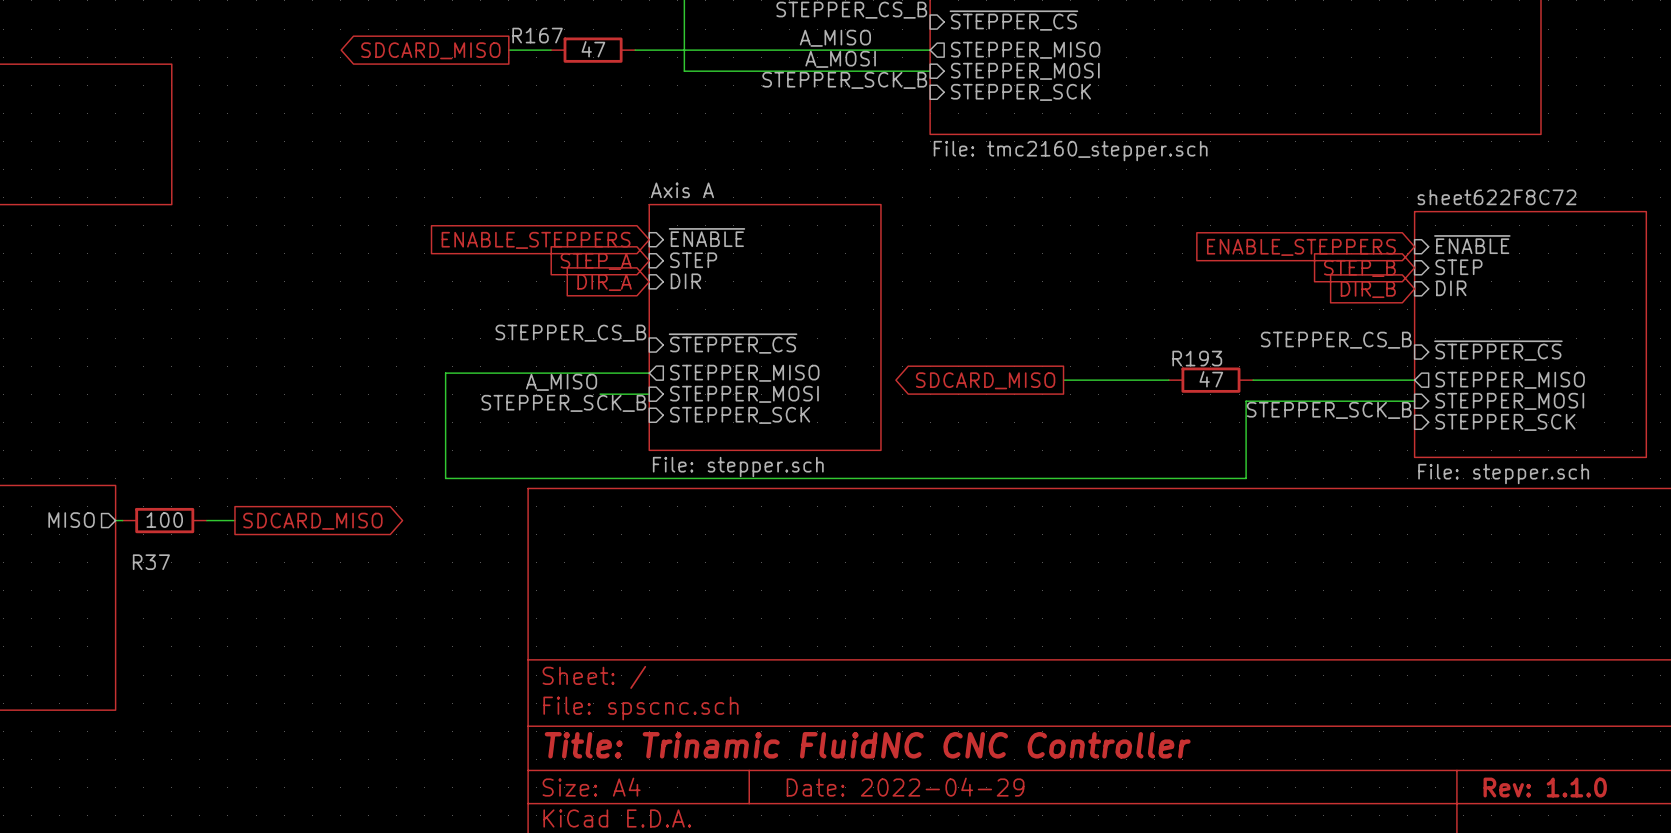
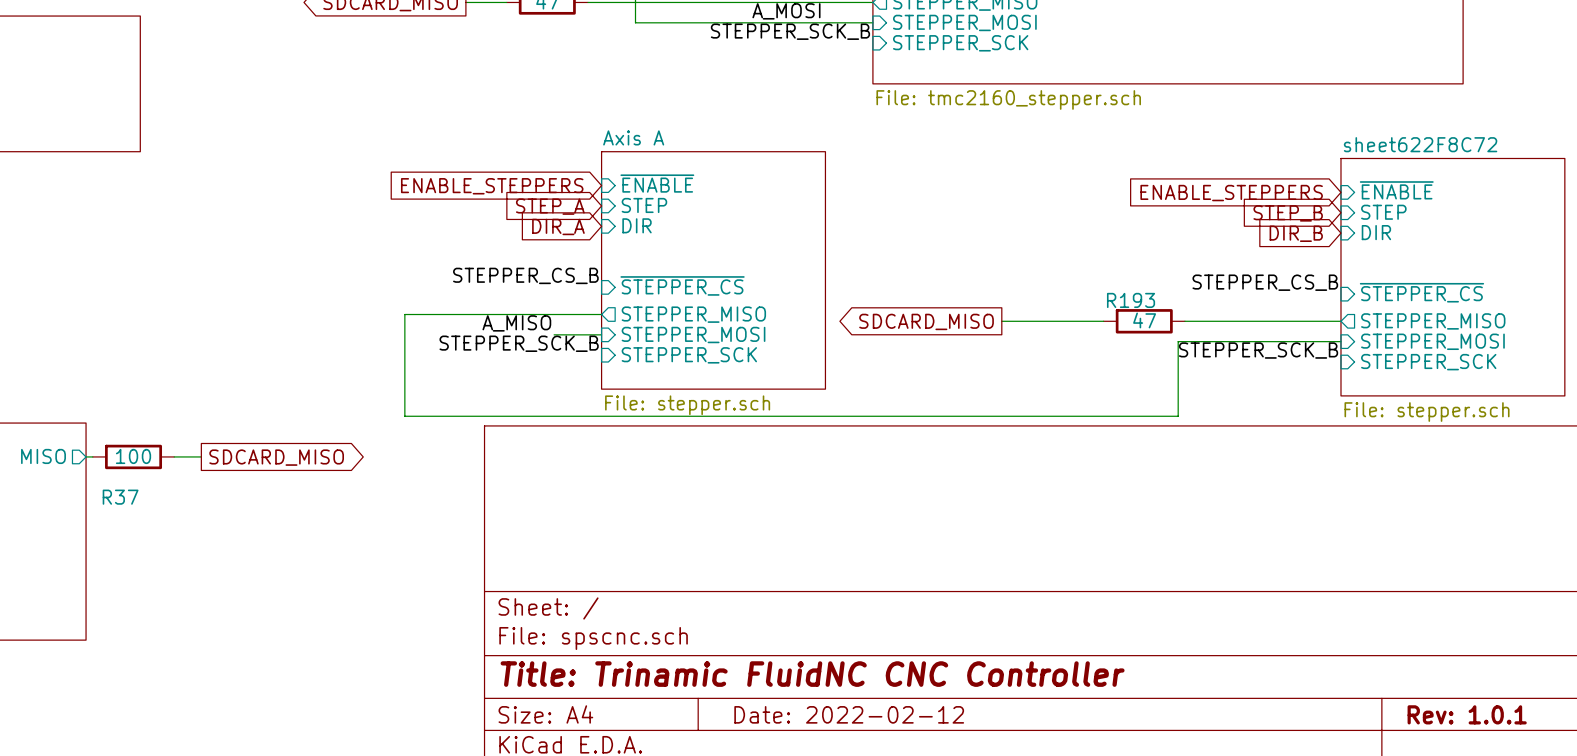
title block: Date: 2022-04-29 (905, 787) -> Date: 2022-02-12 (849, 714)
title block: Rev: 1.1.0 (1545, 787) -> Rev: 1.0.1 (1467, 714)

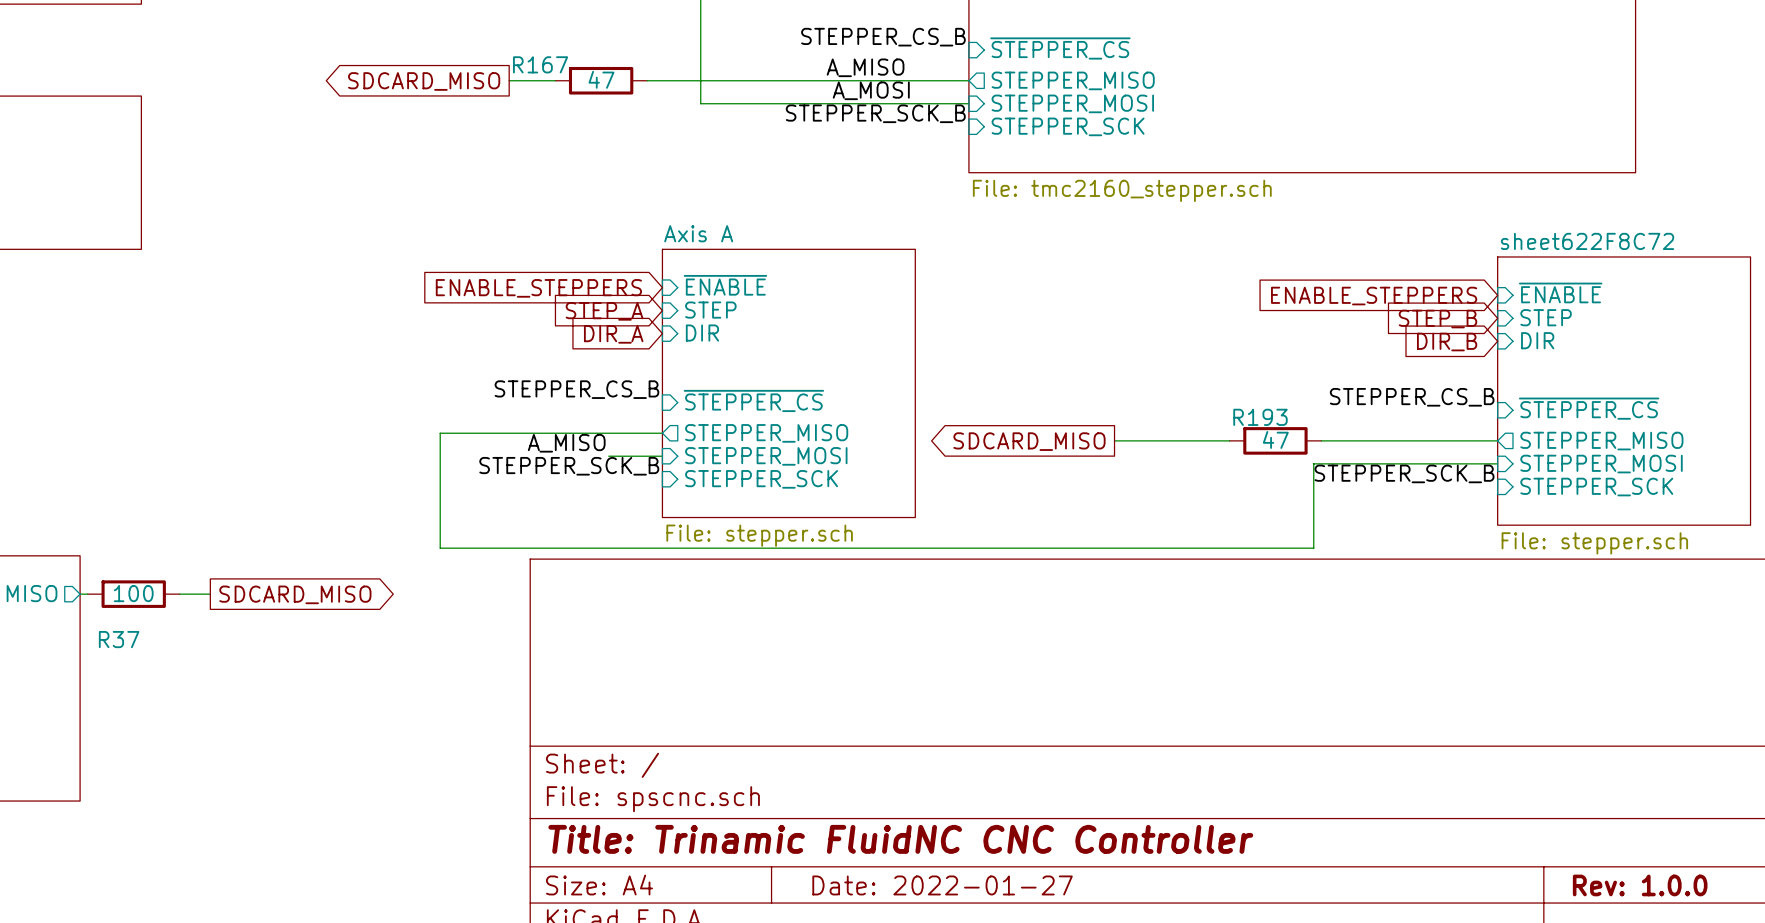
title block: Date: 2022-02-12 (849, 714) -> Date: 2022-01-27 (942, 885)
title block: Rev: 1.0.1 (1467, 714) -> Rev: 1.0.0 (1640, 885)

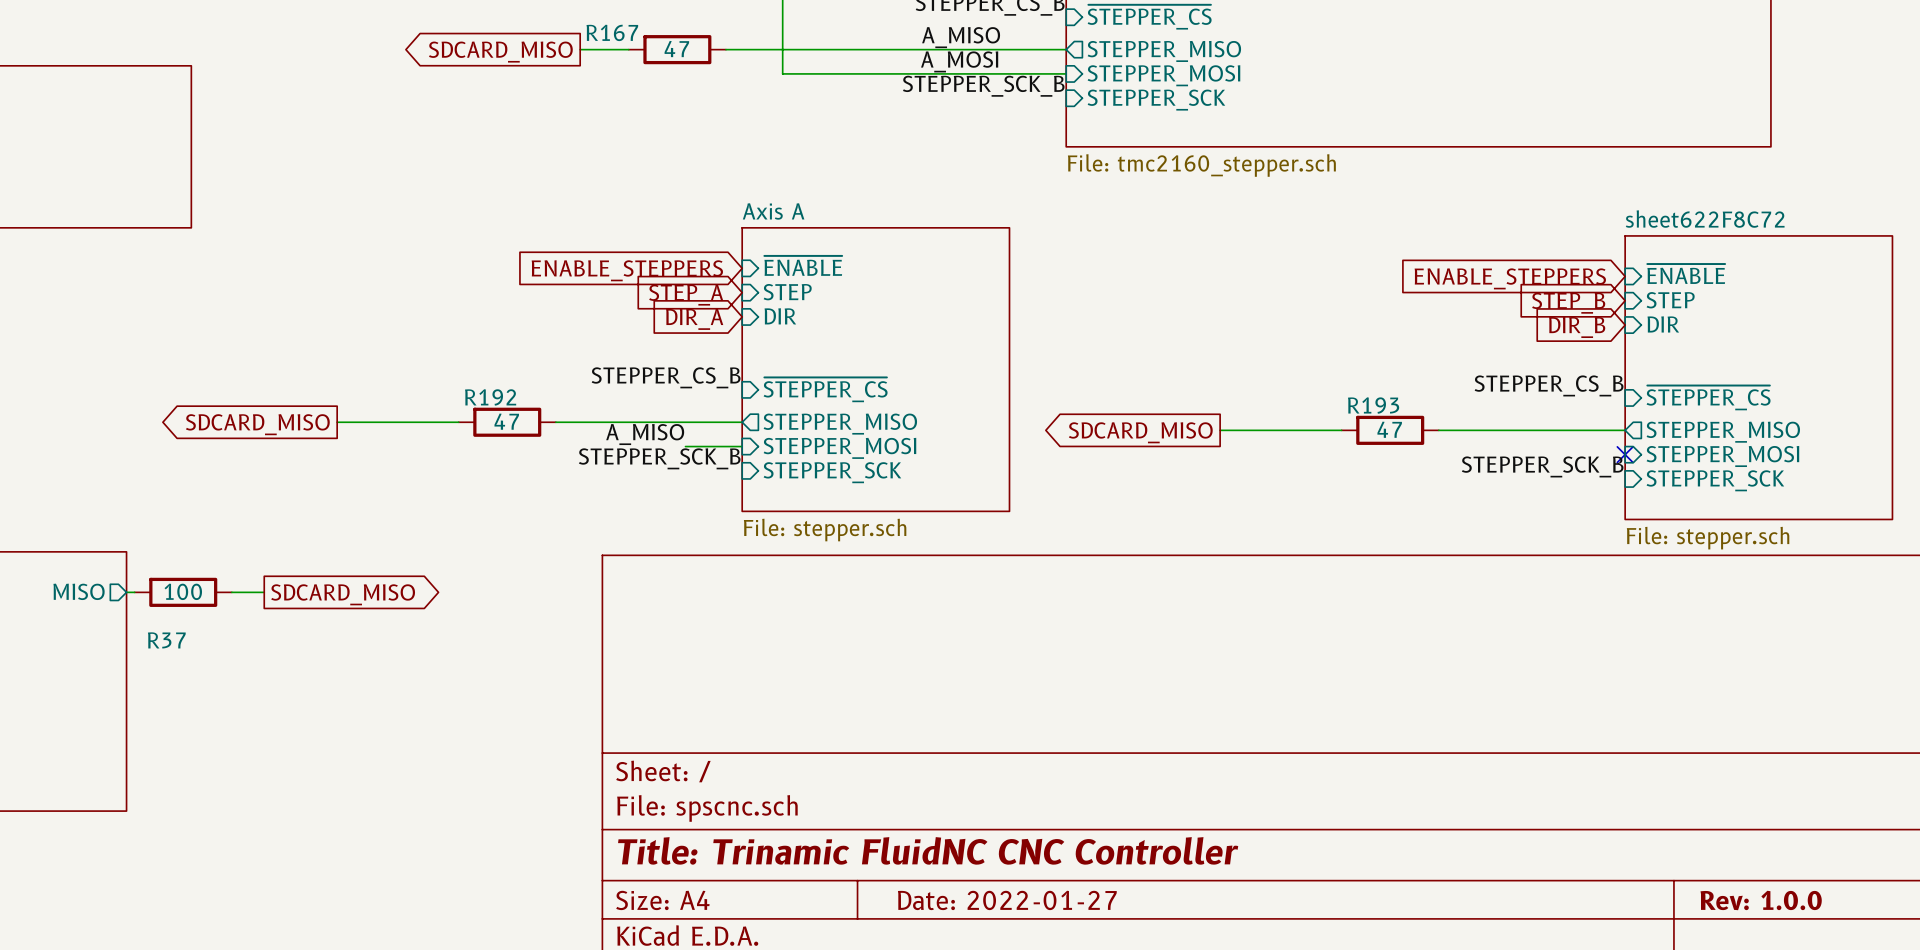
global label: none -> SDCARD_MISO (257, 424)
wire: none -> (337, 422) (458, 422)
R192: none -> 47 (507, 422)
wire: (486, 433) (440, 433) (440, 548) (1313, 548) (1313, 463) (1497, 463) -> none
no-connect mark: none -> (1625, 454)

